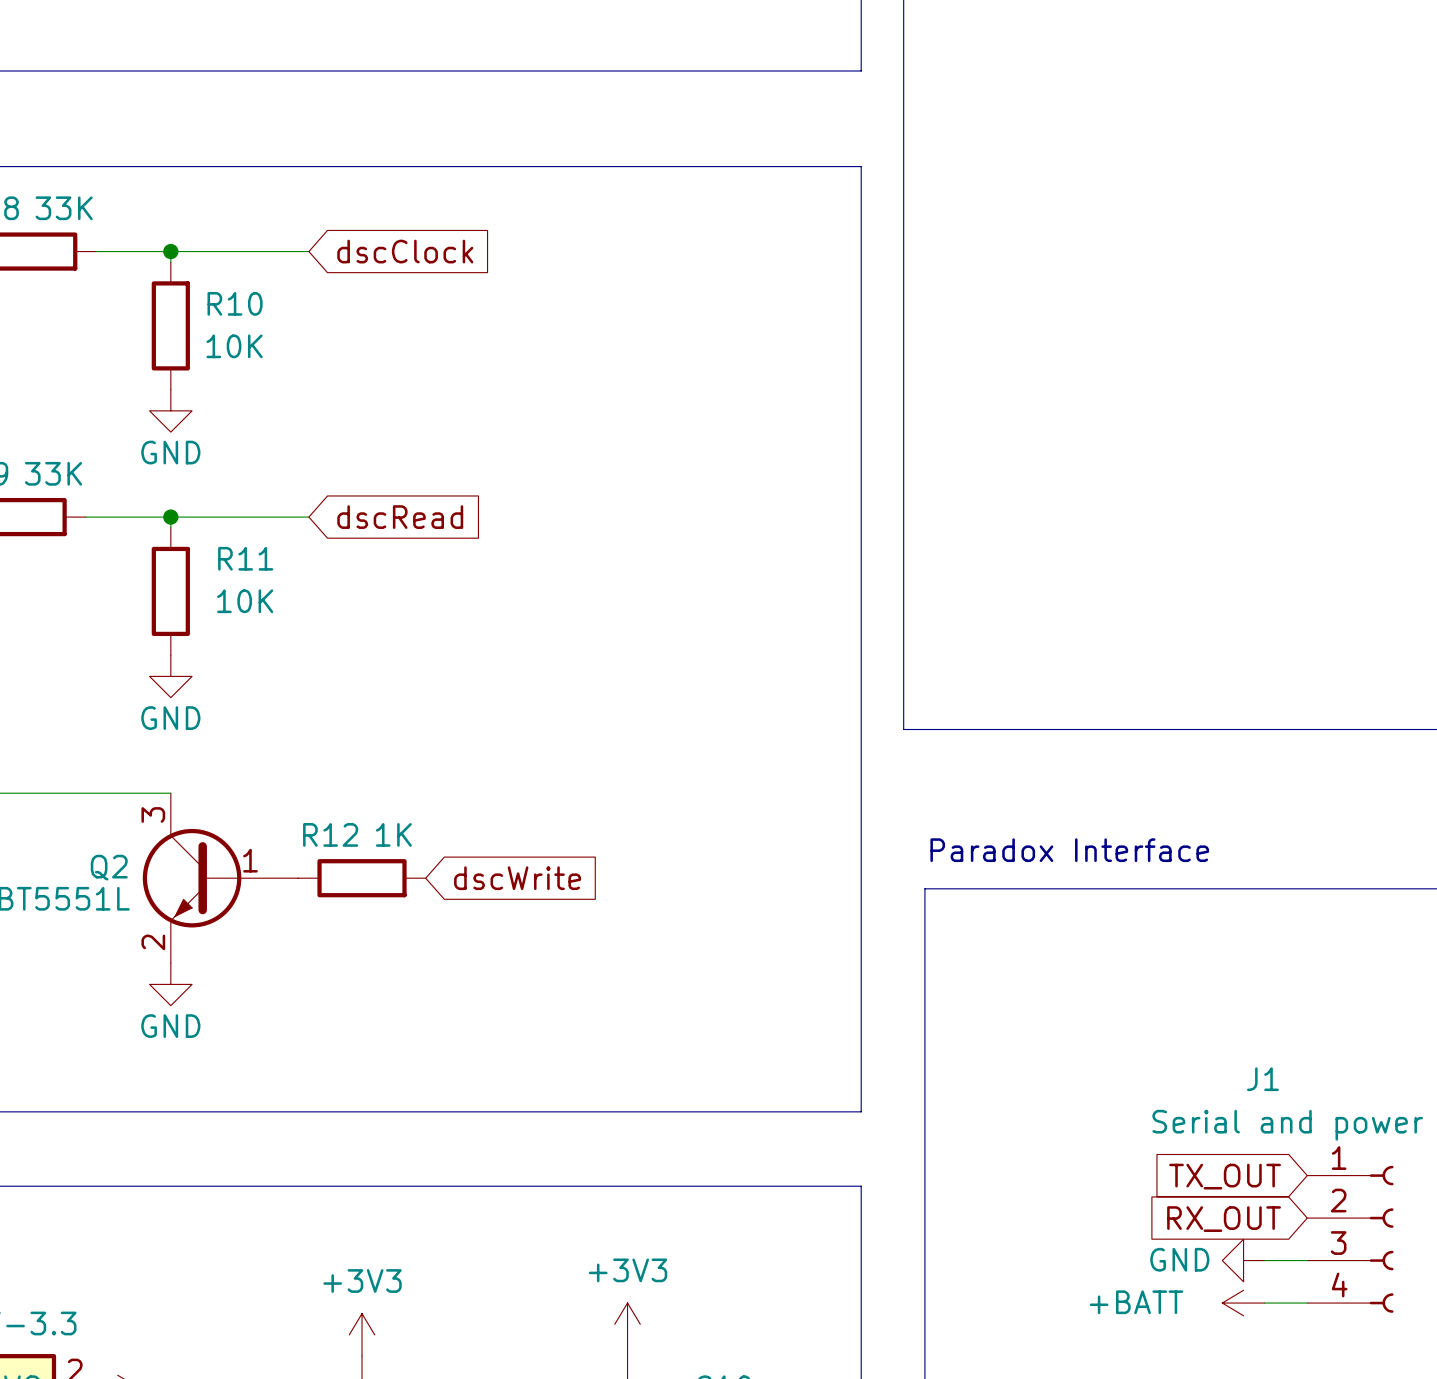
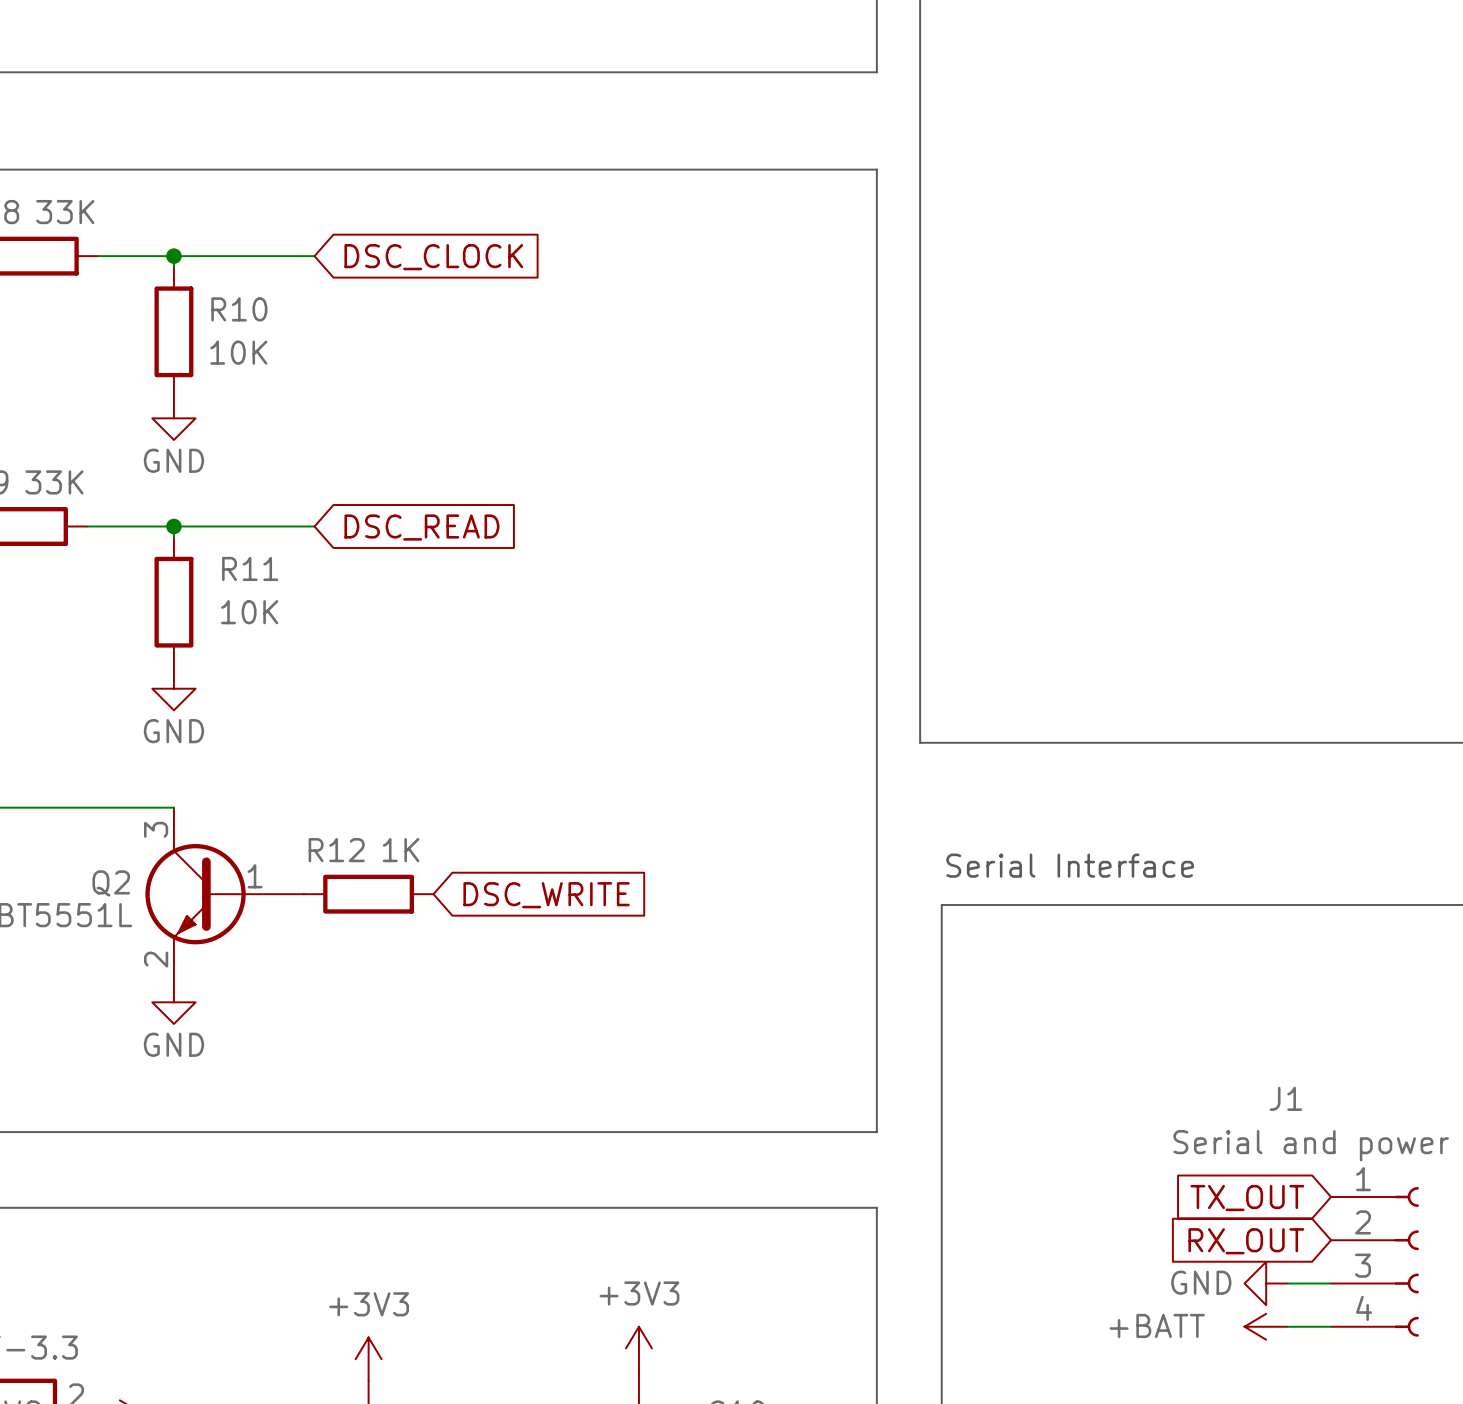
global label: dscClock (405, 251) -> DSC_CLOCK (433, 257)
global label: dscRead (400, 517) -> DSC_READ (421, 527)
text: Paradox Interface (1069, 850) -> Serial Interface (1070, 865)
global label: dscWrite (517, 878) -> DSC_WRITE (546, 895)

